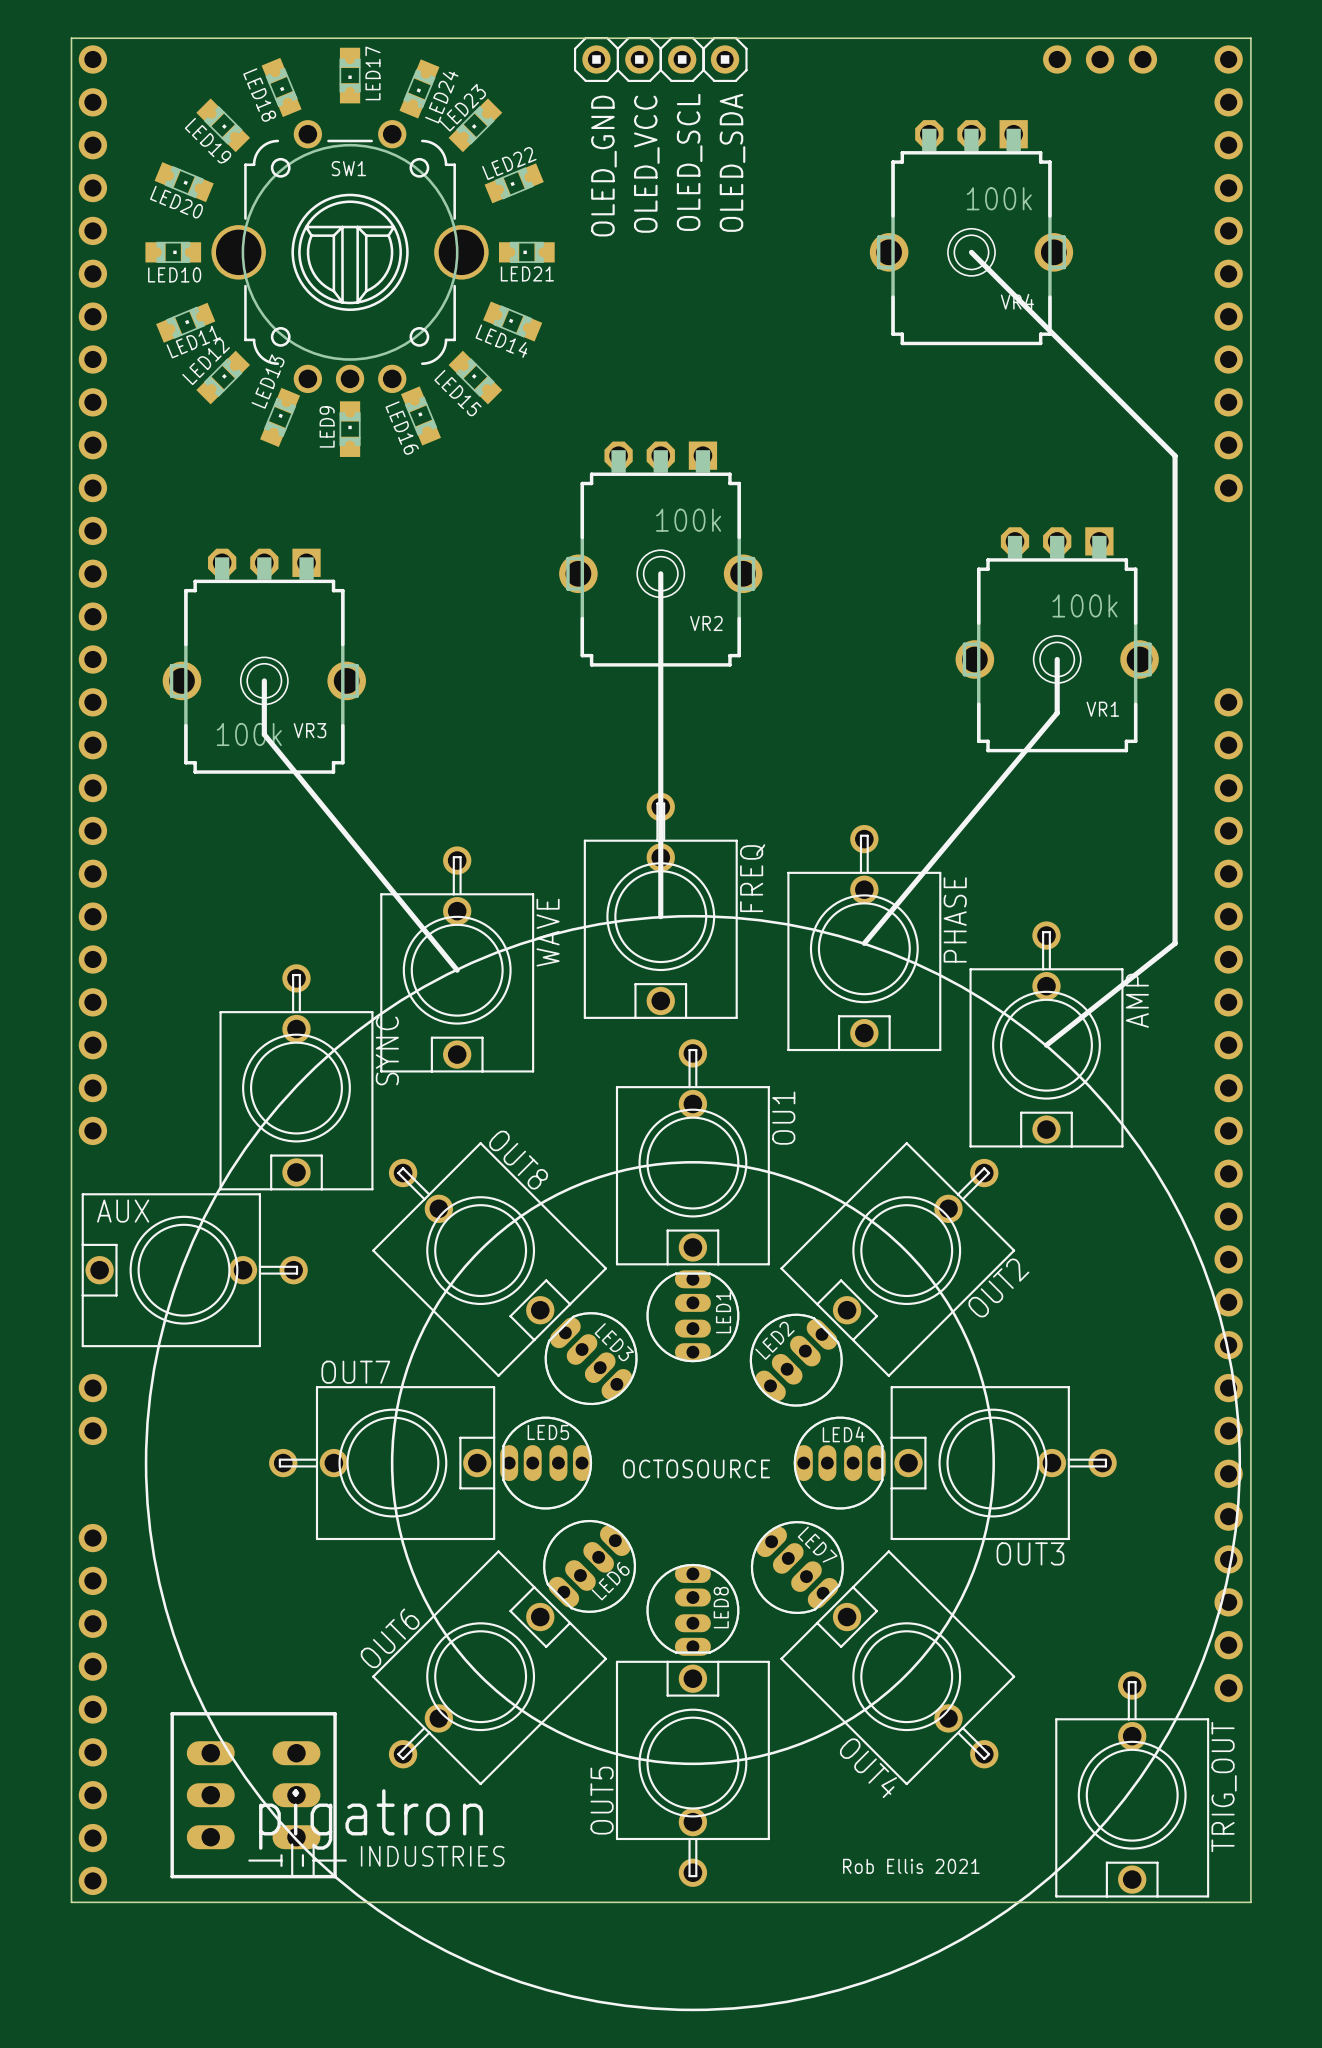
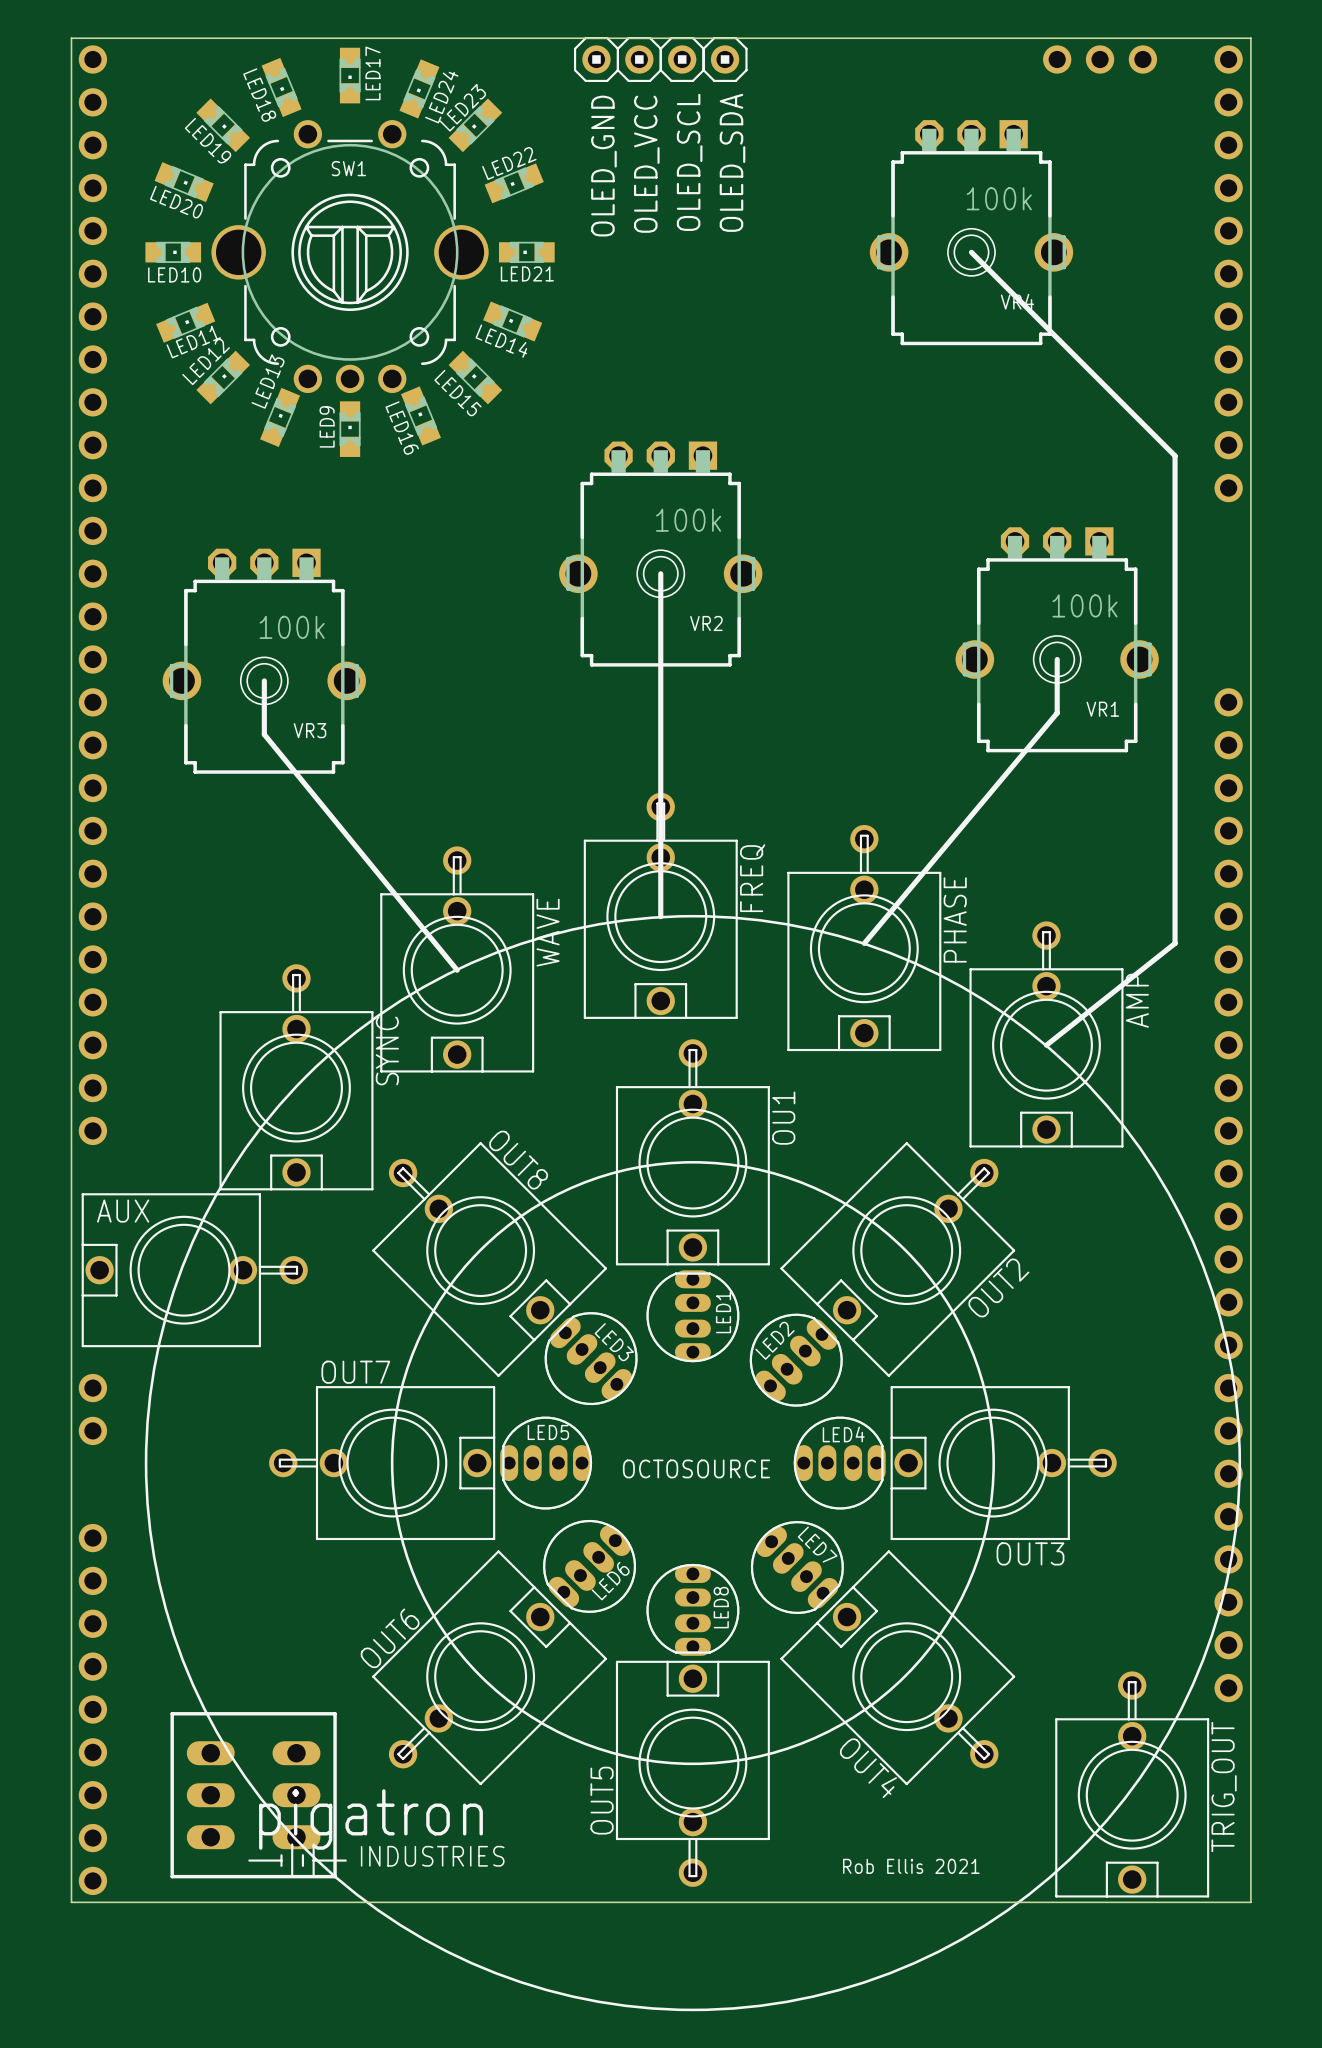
VR3 value position: 100k (249, 734) -> 100k (292, 627)

